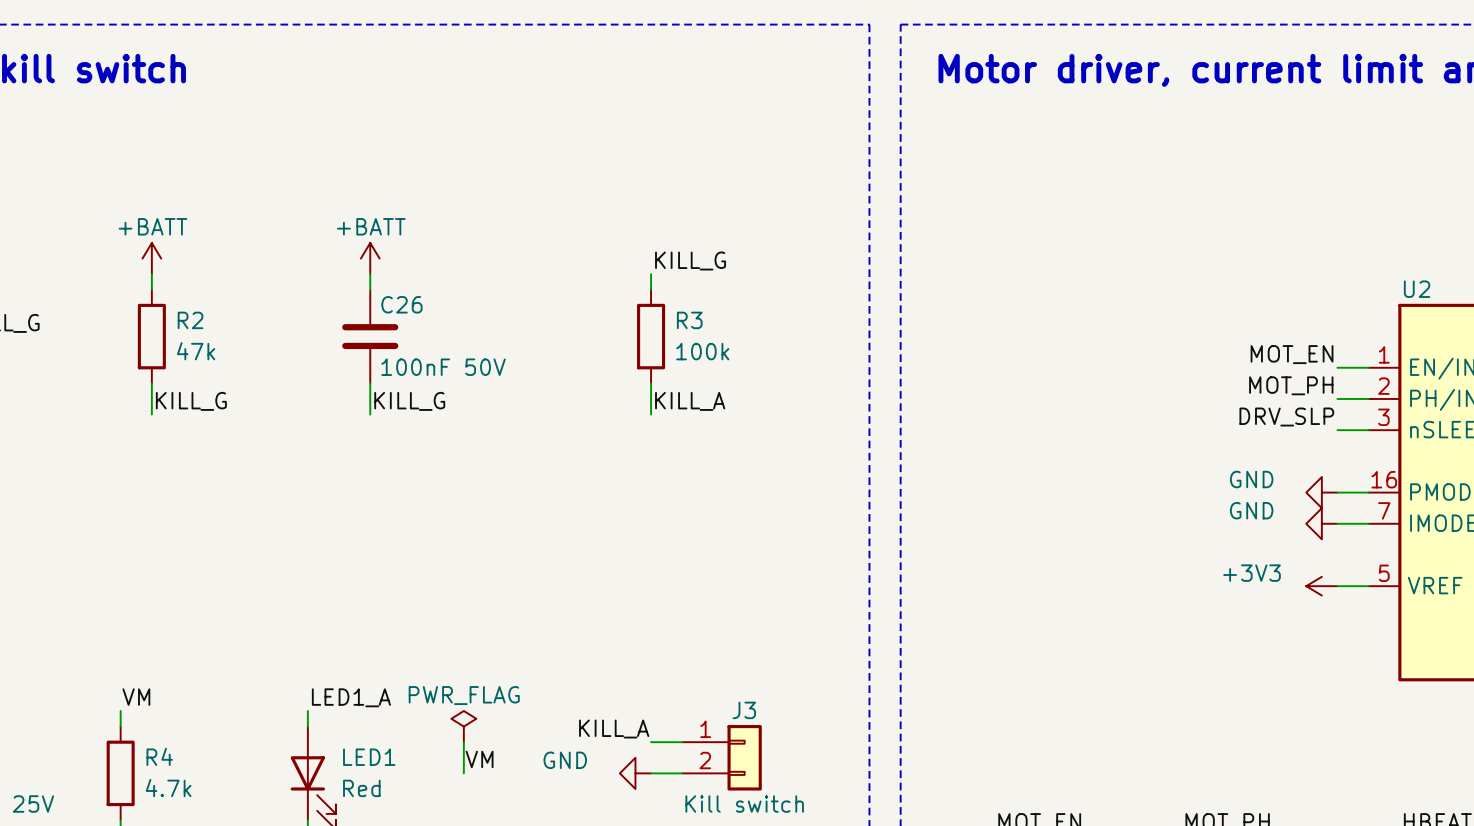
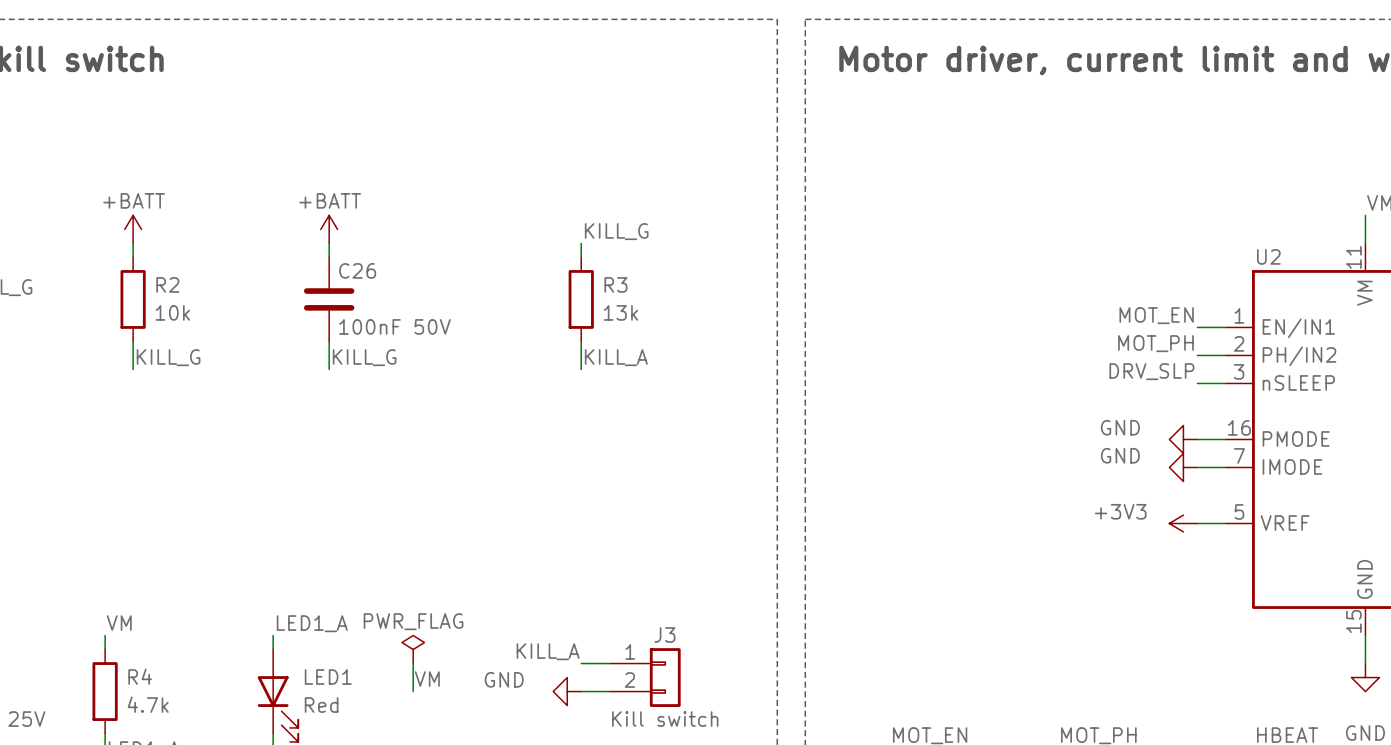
R2 value: 47k (196, 351) -> 10k (172, 312)
R3 value: 100k (702, 351) -> 13k (620, 312)

